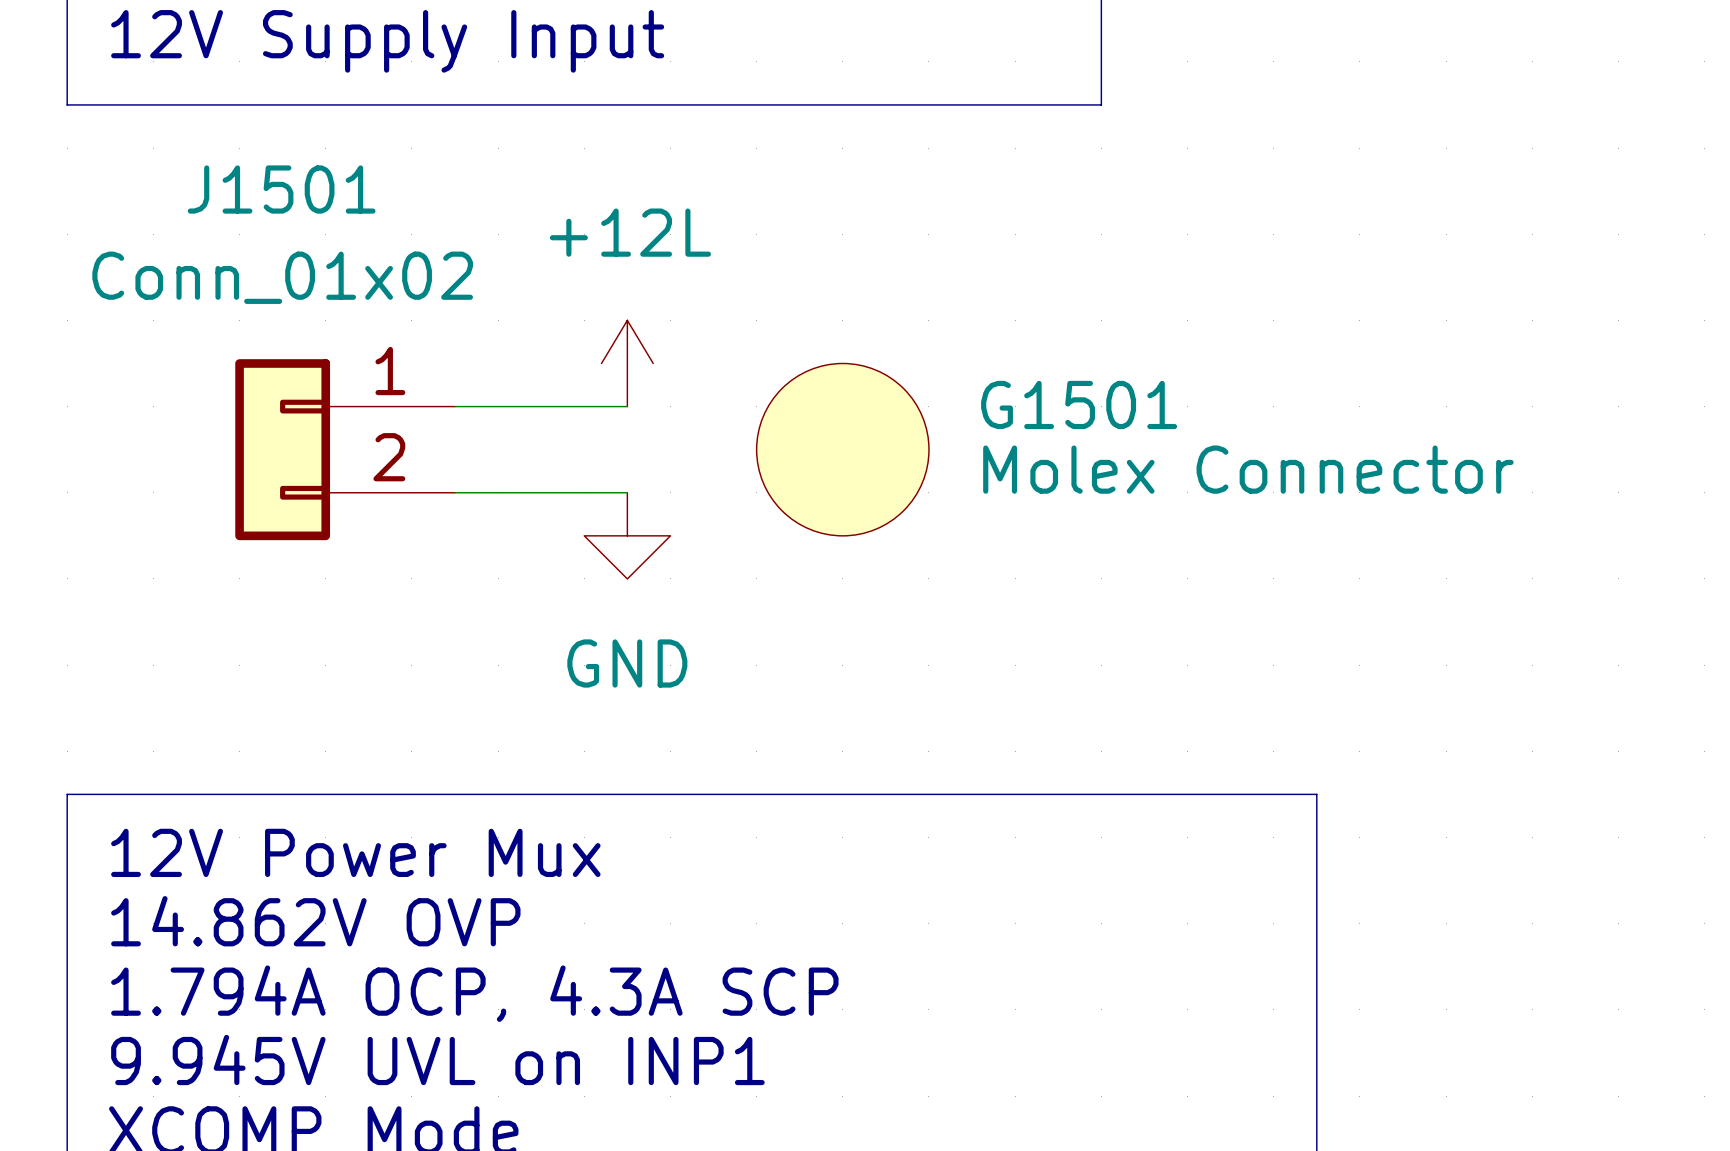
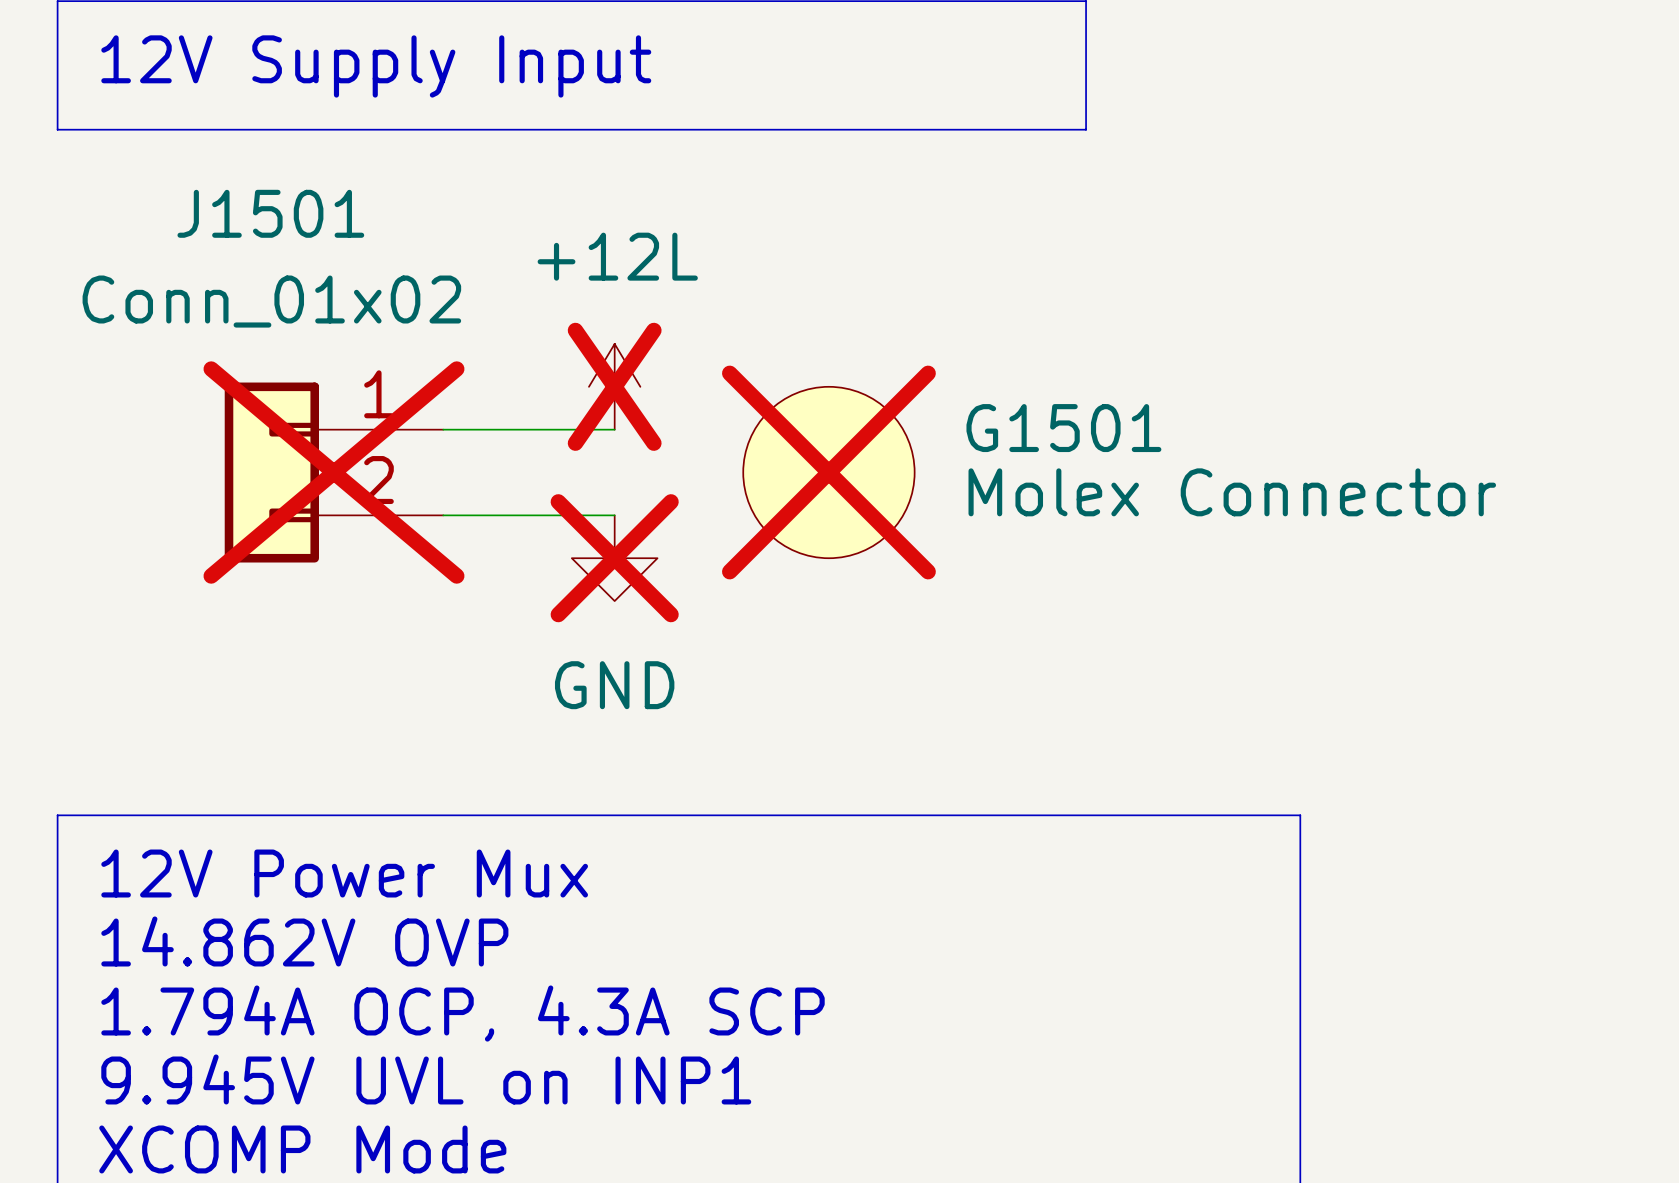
power symbol do-not-place cross: none -> (614, 386)
J1501 do-not-place cross: none -> (333, 472)
G1501 do-not-place cross: none -> (828, 472)
power symbol do-not-place cross: none -> (614, 558)

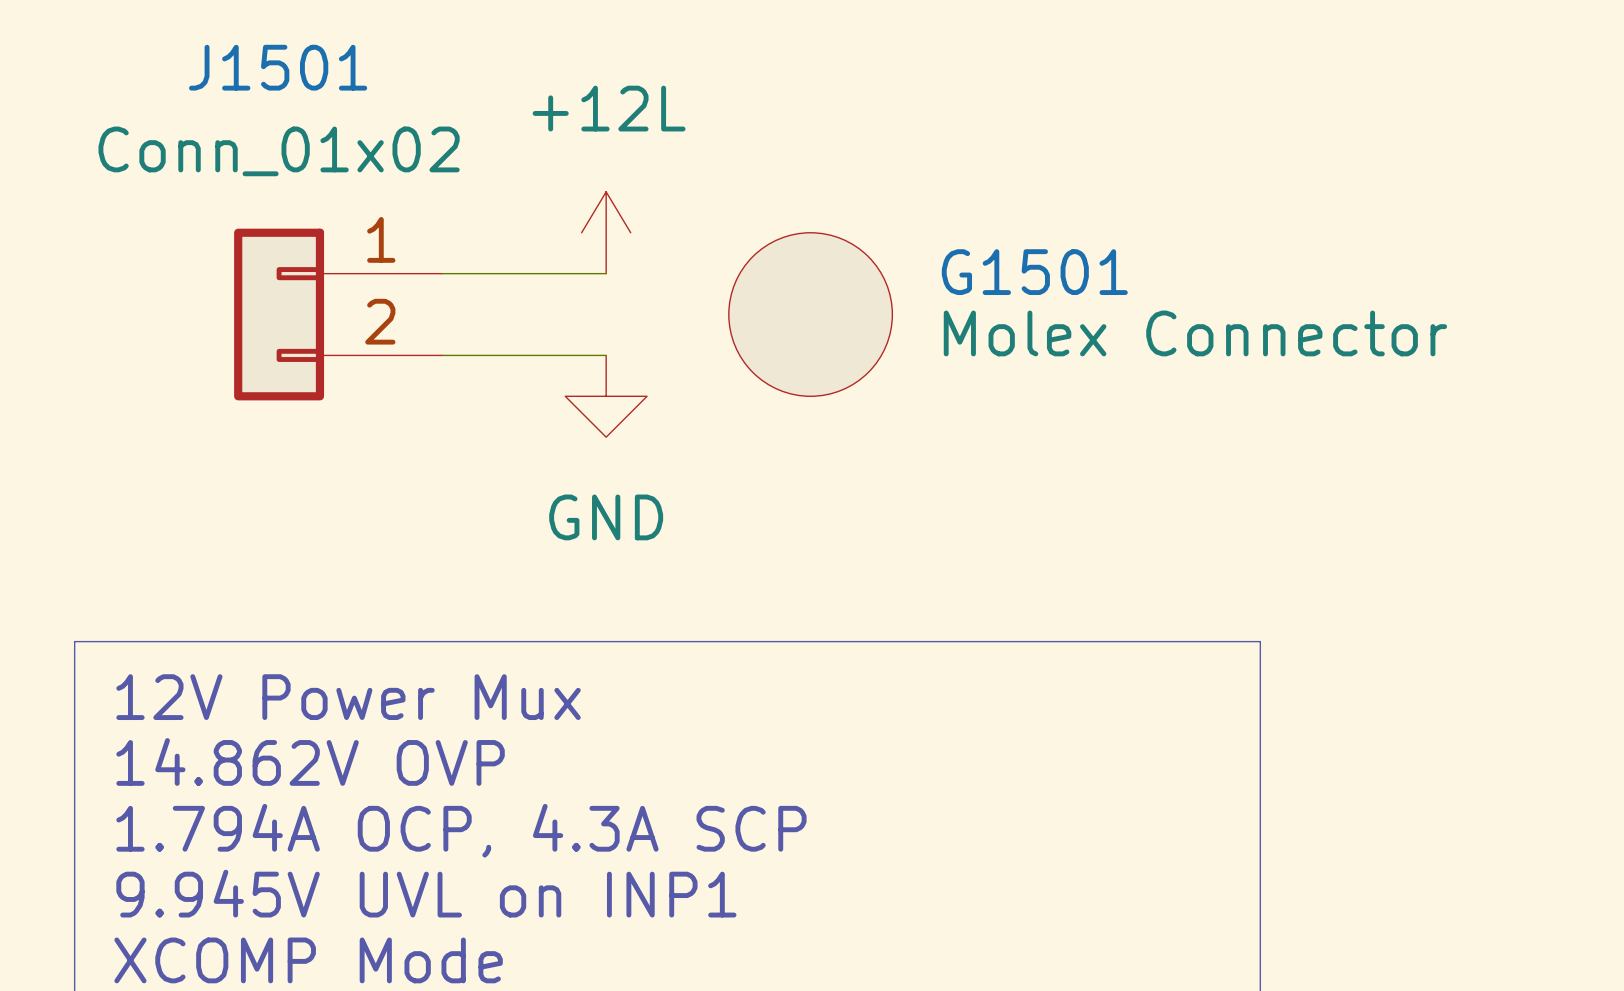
power symbol do-not-place cross: (614, 386) -> none
J1501 do-not-place cross: (333, 472) -> none
G1501 do-not-place cross: (828, 472) -> none
power symbol do-not-place cross: (614, 558) -> none

